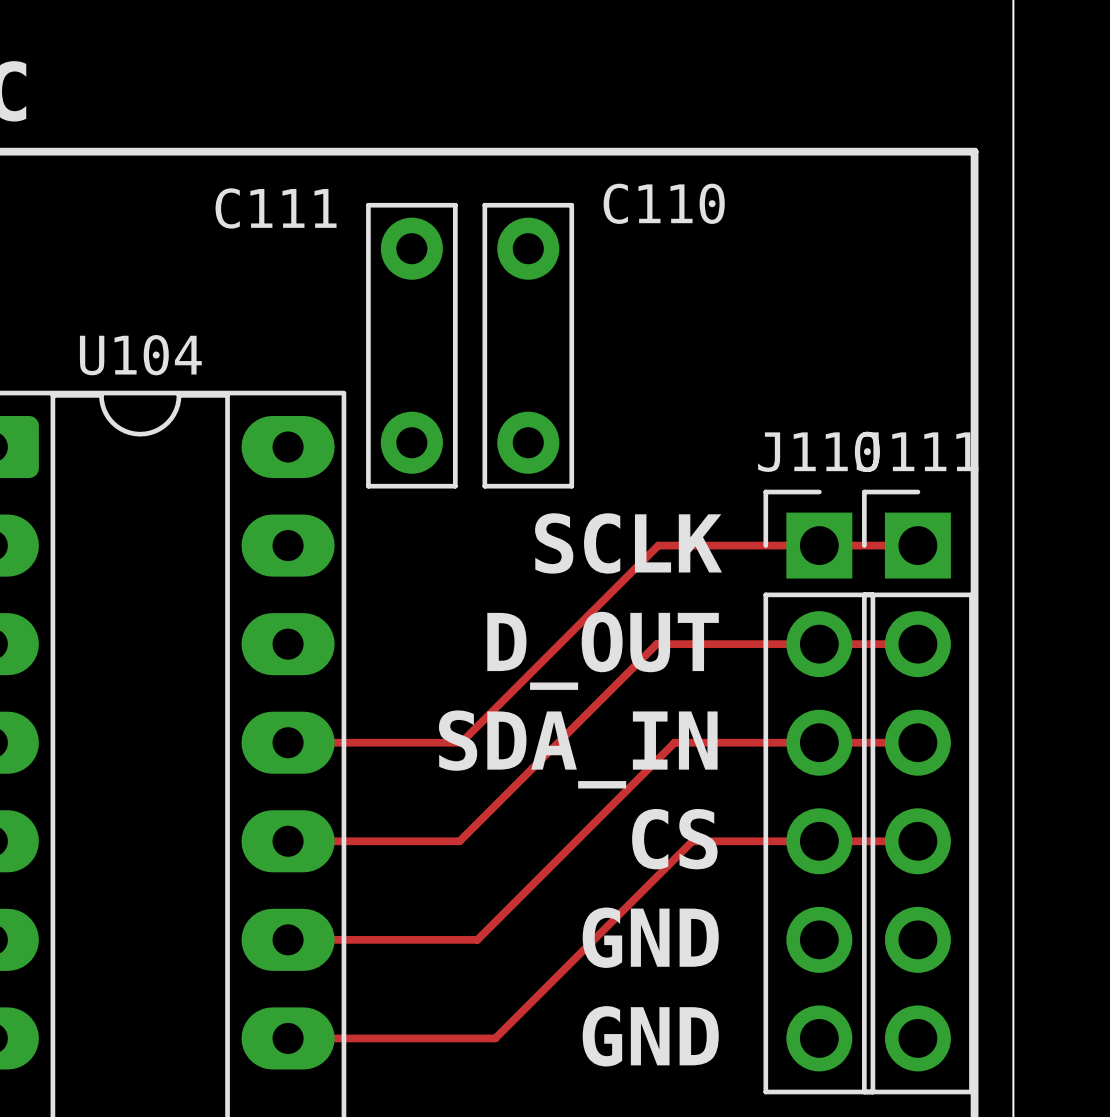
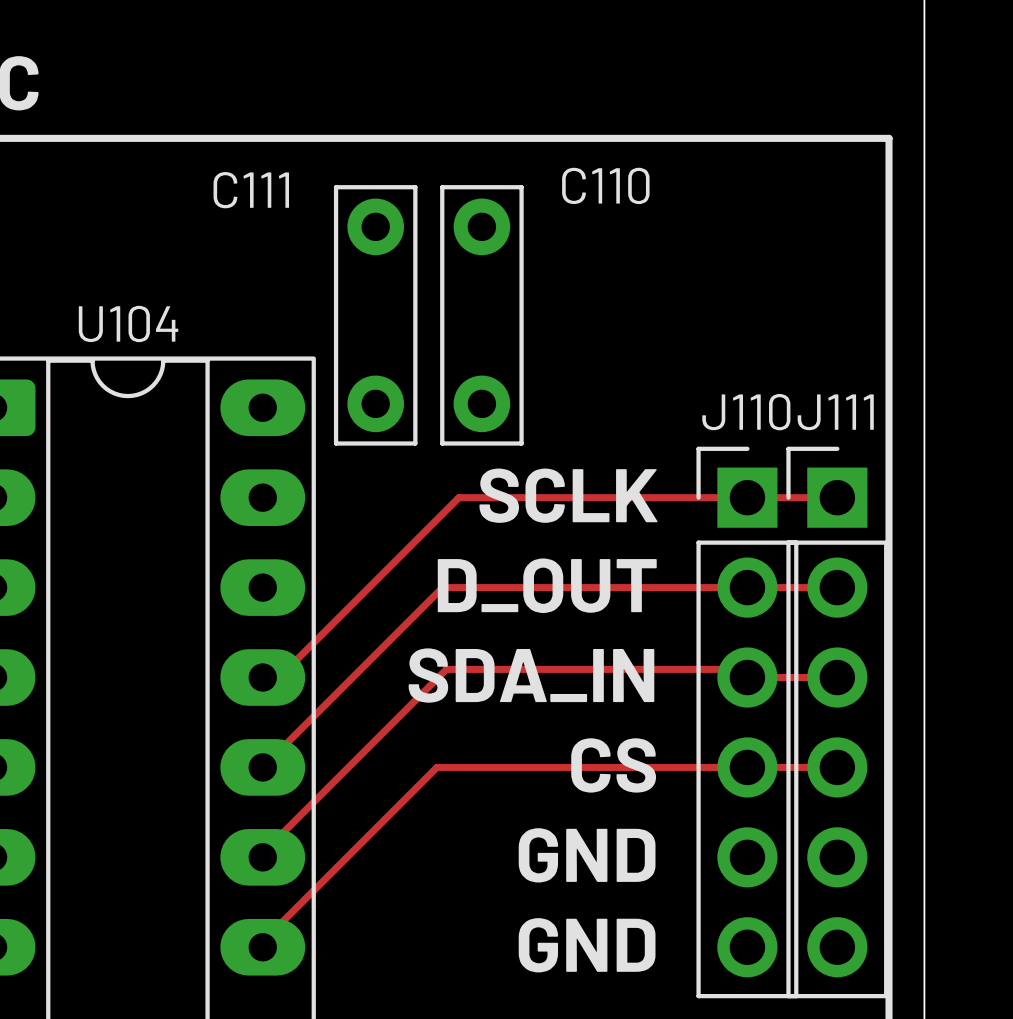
top track: (658, 545) (461, 742) (305, 742) -> (600, 497) (458, 497) (279, 677)
top track: (656, 644) (459, 841) (288, 841) -> (599, 587) (442, 587) (262, 767)
top track: (819, 742) (674, 742) (477, 939) (288, 939) -> (747, 677) (739, 669) (446, 669) (262, 853) (262, 857)
top track: (692, 841) (495, 1038) (288, 1038) -> (631, 767) (436, 767) (262, 941) (262, 947)

